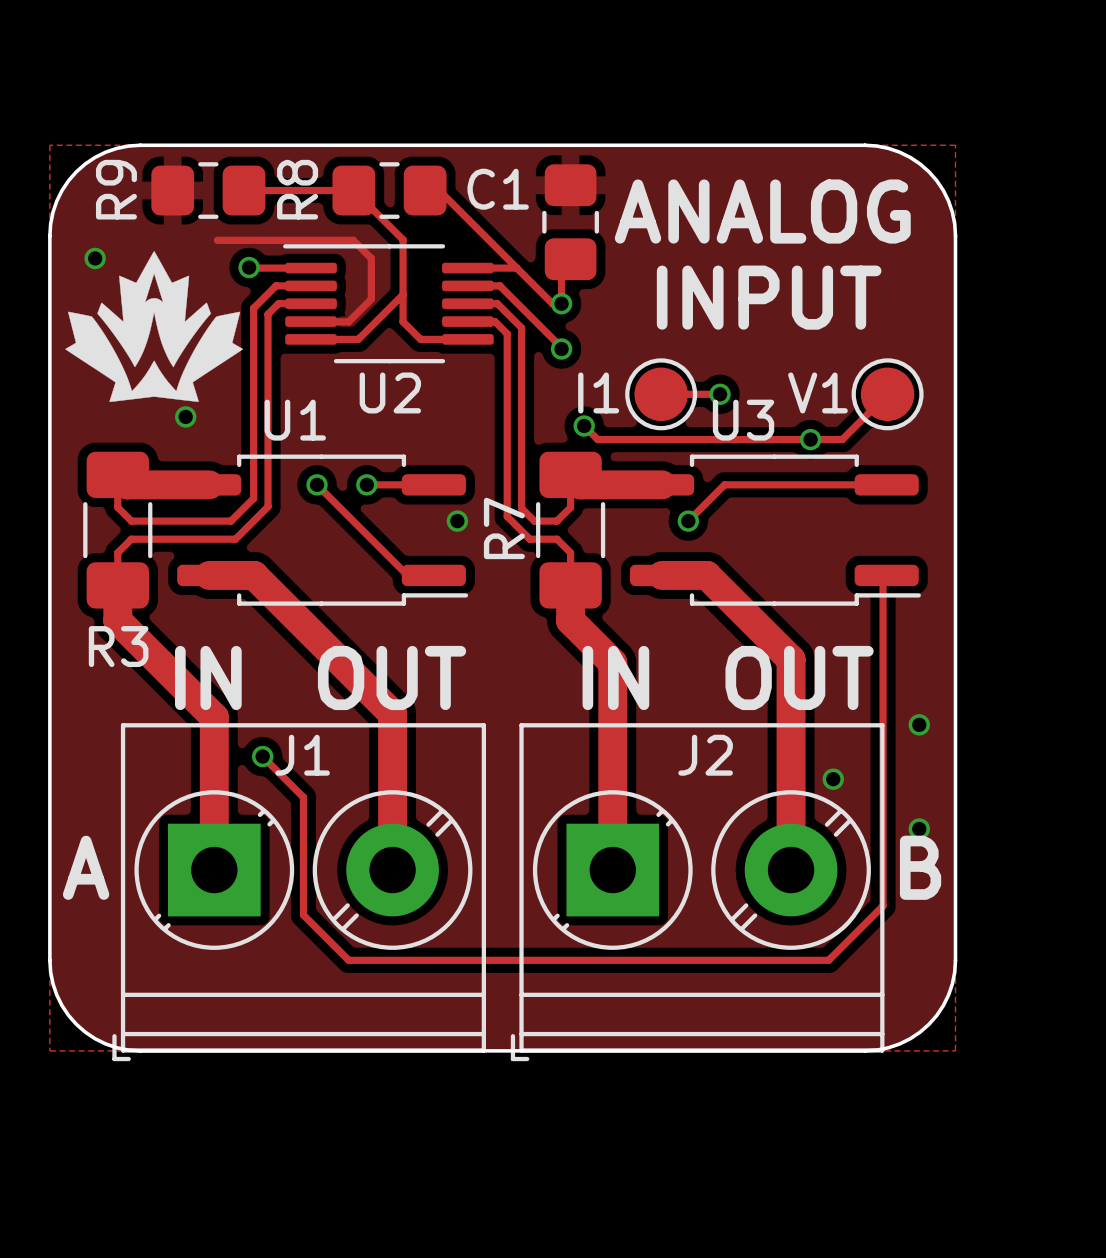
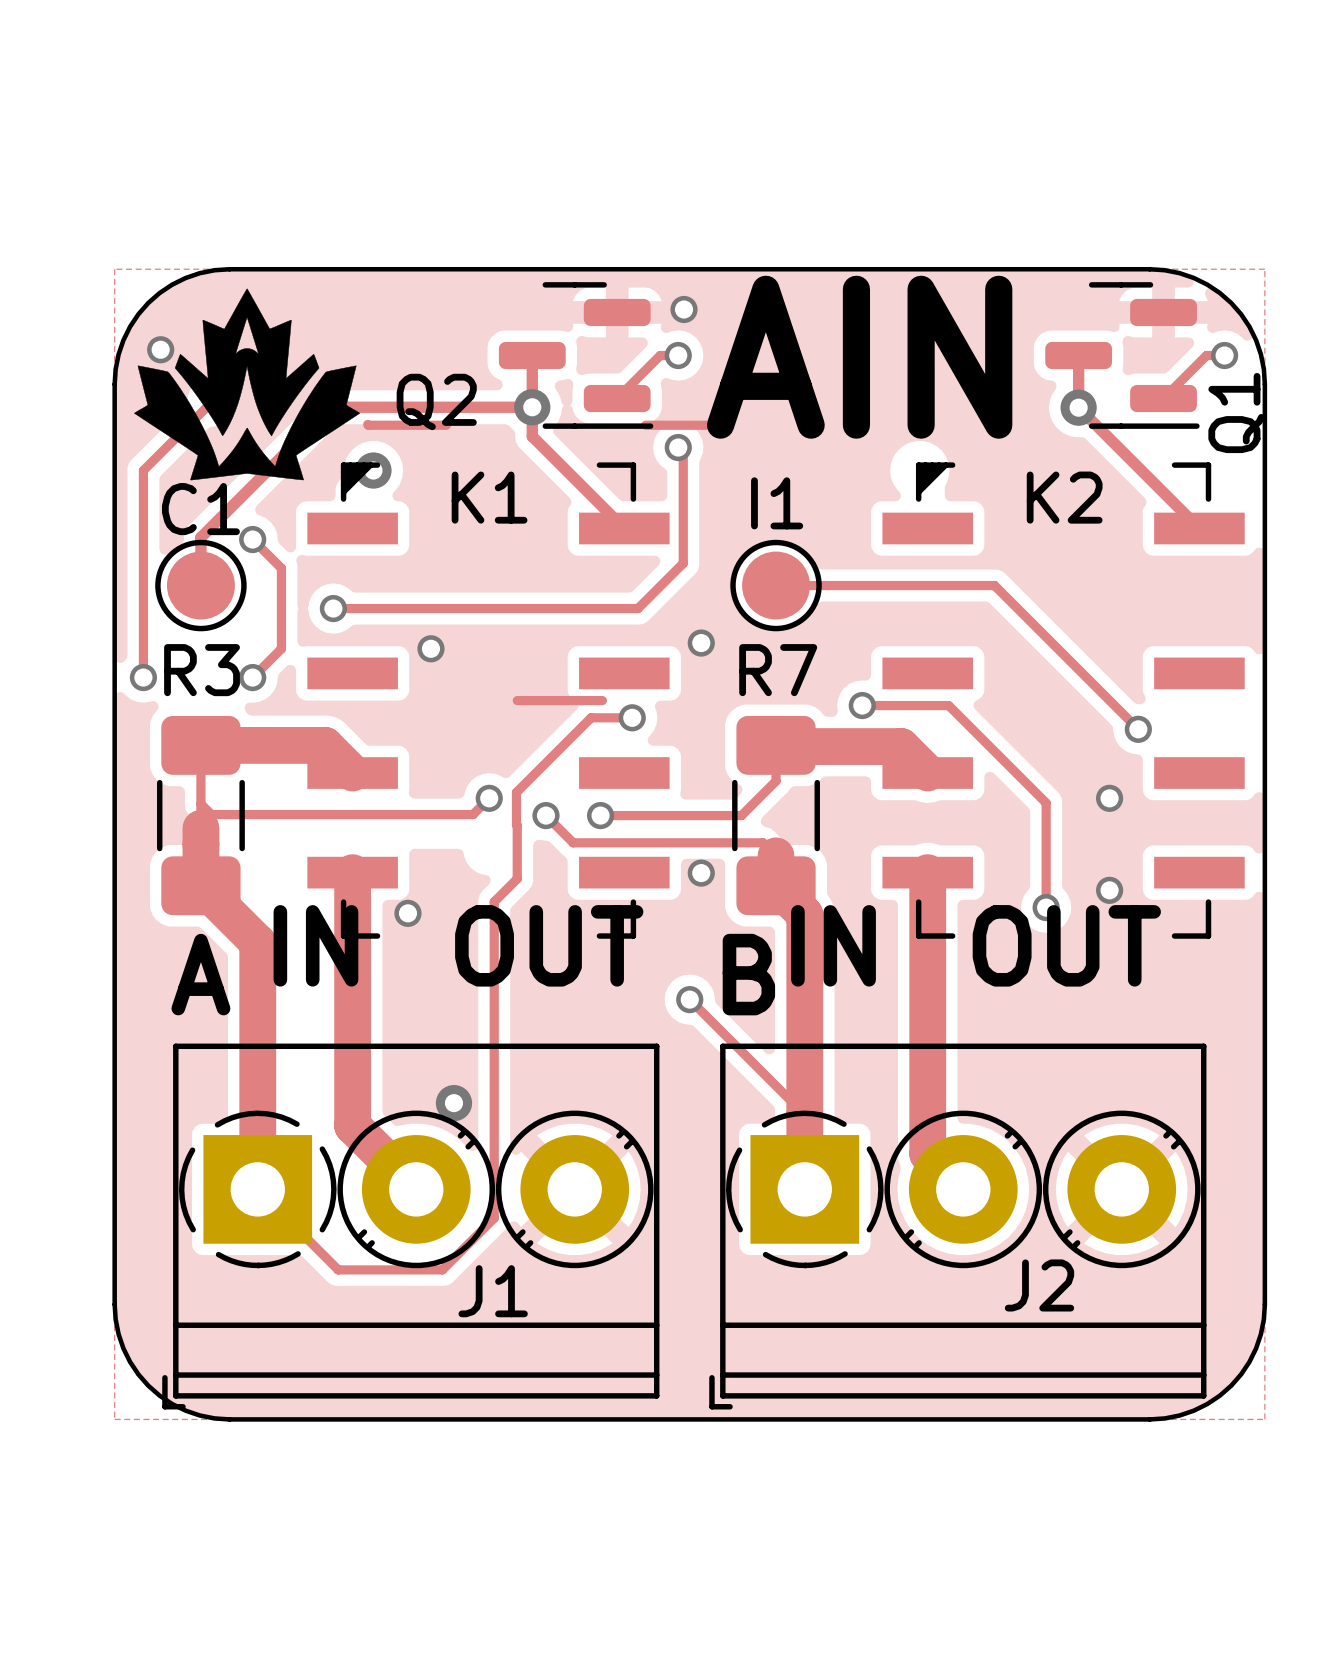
via: none -> (684, 309)
R9: (208, 190) -> none
track: (244, 190) (353, 190) (403, 239) (403, 321) (420, 339) (467, 339) -> none
R8: (389, 190) -> none
track: (425, 190) (439, 190) (552, 303) (561, 303) (561, 272) -> none
text: ANALOG (762, 211) -> none
track: none -> (532, 355) (532, 436) (624, 528)
Q2: none -> (576, 355)
track: none -> (678, 355) (660, 355) (617, 398)
via: none -> (678, 355)
track: none -> (1078, 355) (1078, 407) (1199, 528)
Q1: none -> (1122, 355)
track: none -> (1224, 355) (1206, 355) (1163, 398)
via: none -> (1224, 355)
text: none -> AIN (859, 357)
C1: (570, 222) -> none
track: (217, 240) (353, 240) (371, 258) (371, 299) (348, 321) (311, 321) -> none
track: none -> (212, 401) (143, 470) (143, 677)
track: none -> (532, 407) (331, 407) (200, 537) (200, 585)
via: none -> (532, 407)
via: none -> (1078, 407)
via position: (95, 258) -> (160, 349)
via: (249, 267) -> none
track: (311, 285) (275, 285) (253, 308) (253, 498) (231, 521) (131, 521) (117, 507) (117, 474) (127, 484) (209, 484) -> none
track: (467, 285) (499, 285) (561, 349) -> none
track: none -> (678, 447) (683, 452) (683, 563) (638, 608) (333, 608)
via: none -> (678, 447)
track: (403, 294) (358, 339) (311, 339) -> none
text: INPUT (769, 297) -> none
via: none -> (373, 470)
track: (311, 303) (278, 303) (268, 314) (268, 506) (235, 539) (131, 539) (117, 552) -> (352, 773) (325, 745) (200, 745) (200, 786)
U2: (388, 303) -> none
track: (467, 303) (497, 303) (521, 327) (521, 508) (534, 521) (557, 521) (570, 507) (570, 474) (580, 484) (662, 484) -> none
via: (561, 303) -> none
track: (467, 321) (494, 321) (507, 333) (507, 516) (529, 539) (557, 539) (570, 552) (570, 607) -> (545, 815) (573, 842) (763, 842) (776, 855)
drawing position: (154, 326) -> (247, 384)
via: (561, 349) -> none
track: none -> (252, 539) (281, 568) (281, 648) (252, 677)
via: none -> (252, 539)
part value position: I1 (598, 392) -> I1 (777, 503)
part: none -> C1 (200, 585)
track: none -> (776, 585) (891, 585)
part position: (661, 394) -> (776, 585)
track: none -> (965, 585) (994, 585) (1138, 729)
via: (720, 394) -> none
track: (887, 394) (842, 439) (597, 439) (584, 426) -> none
part: V1 (887, 394) -> none
via: none -> (333, 608)
via: (185, 416) -> none
via: (584, 426) -> none
via: none -> (701, 643)
via: (810, 439) -> none
via: none -> (430, 648)
via: none -> (143, 677)
via: none -> (252, 677)
track: (317, 484) (407, 575) (432, 575) -> (927, 773) (901, 746) (776, 745) (776, 781) (741, 815) (602, 815)
via: (317, 484) -> none
K1: none -> (488, 700)
via: (366, 484) -> none
K2: none -> (1063, 700)
track: (886, 484) (724, 484) (688, 521) -> none
track: none -> (862, 705) (948, 705) (1046, 802) (1046, 907)
via: none -> (862, 705)
via: none -> (1138, 729)
via position: (457, 521) -> (632, 717)
via: (688, 521) -> none
R7 name rotation: 0° (504, 528) -> 90° clockwise (778, 670)
R7 name position: R7 (504, 528) -> R7 (778, 670)
R3 position: (117, 530) -> (200, 815)
U1: (322, 530) -> none
R7 position: (570, 530) -> (776, 815)
U3: (775, 530) -> none
track: none -> (489, 798) (472, 814) (211, 814) (200, 804)
via: none -> (489, 798)
via: none -> (1109, 798)
track: (209, 575) (254, 575) (392, 713) (392, 870) -> none
via: none -> (545, 815)
via: none -> (600, 815)
track: (662, 575) (706, 575) (791, 659) (791, 870) -> none
track: (886, 575) (883, 579) (883, 905) (828, 960) (348, 960) (303, 915) (303, 797) (262, 756) -> none
track: (117, 620) (214, 717) (214, 870) -> (200, 873) (200, 885) (257, 942) (257, 1189) (338, 1269) (442, 1269) (494, 1218) (494, 901) (517, 878) (516, 792) (591, 717) (632, 717)
track: none -> (352, 872) (352, 1125) (416, 1189)
via: none -> (701, 873)
track: (570, 620) (612, 662) (612, 870) -> (776, 873) (776, 885) (804, 914) (804, 1189)
track: none -> (927, 872) (927, 1153) (963, 1189)
via: none -> (1109, 890)
R3 name position: R3 (118, 646) -> R3 (202, 670)
via: none -> (1046, 907)
via: none -> (407, 913)
track: none -> (689, 999) (804, 1114)
via: none -> (689, 999)
J1 footprint: [112, 723, 487, 1062] -> [162, 1043, 660, 1410]
J2 footprint: [510, 723, 885, 1062] -> [709, 1043, 1207, 1410]
via: (919, 724) -> none
J1 name position: J1 (302, 755) -> J1 (493, 1291)
J2 name position: J2 (705, 755) -> J2 (1039, 1285)
via: (262, 756) -> none
via: (833, 779) -> none
via: none -> (453, 1103)
via: (919, 829) -> none
text position: A (86, 867) -> A (200, 974)
text position: B (920, 867) -> B (748, 974)

